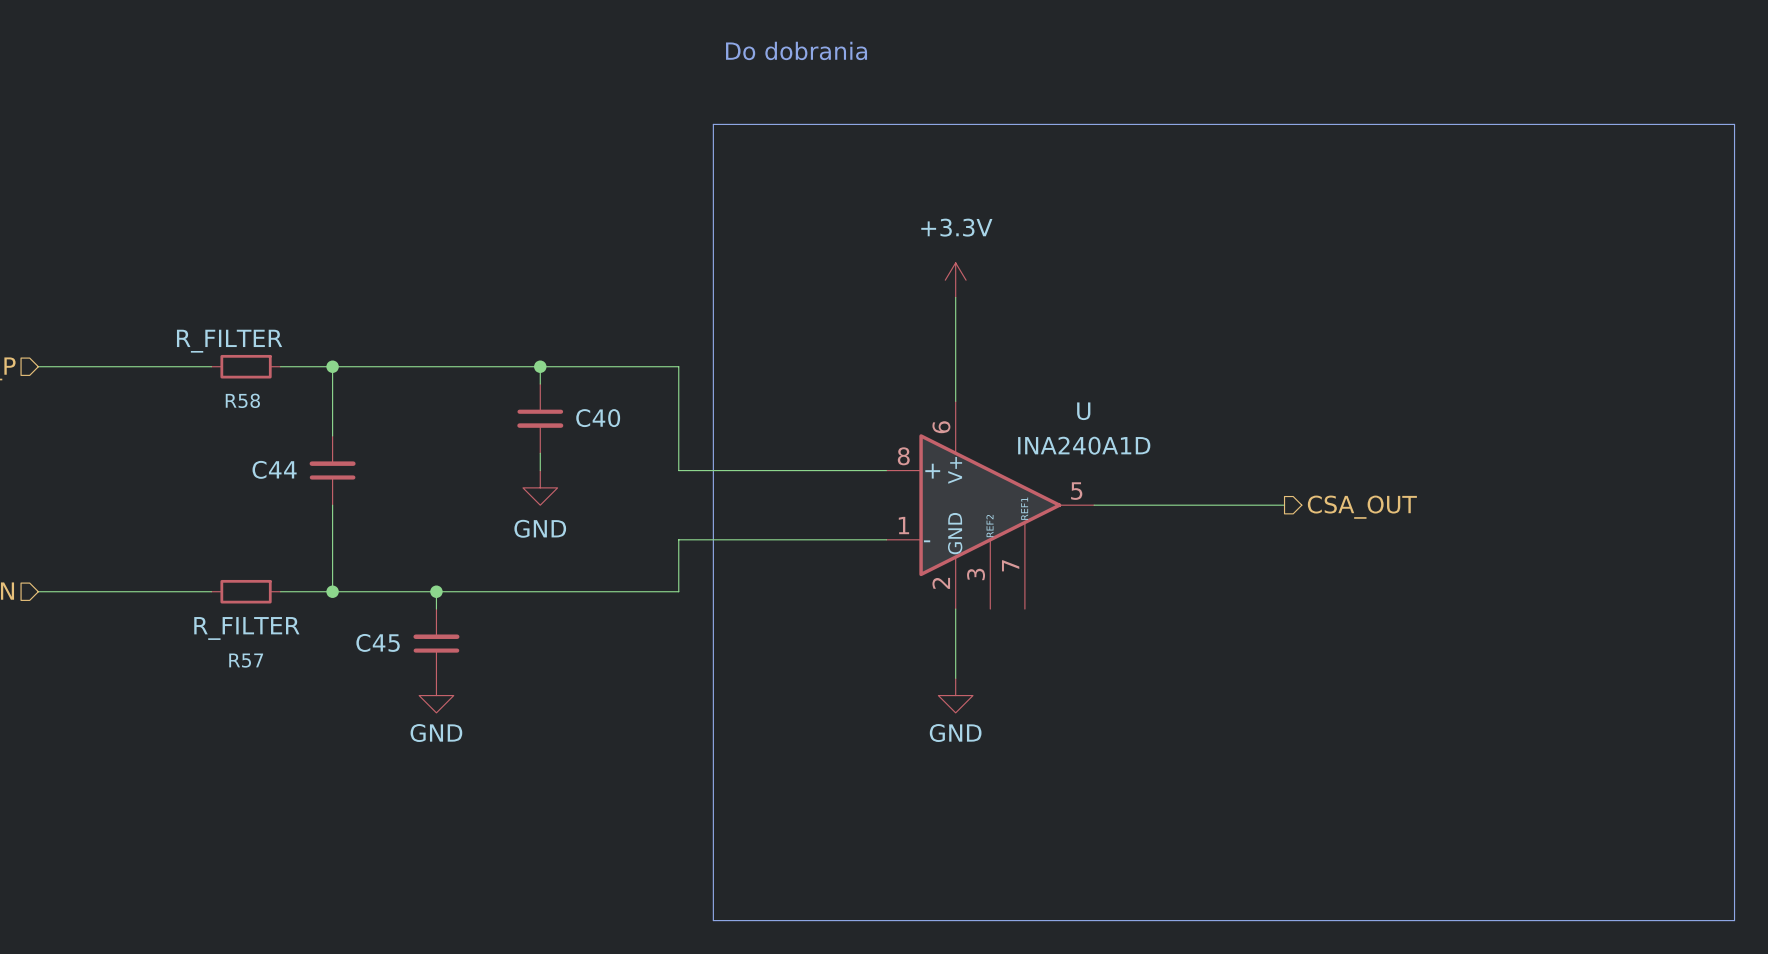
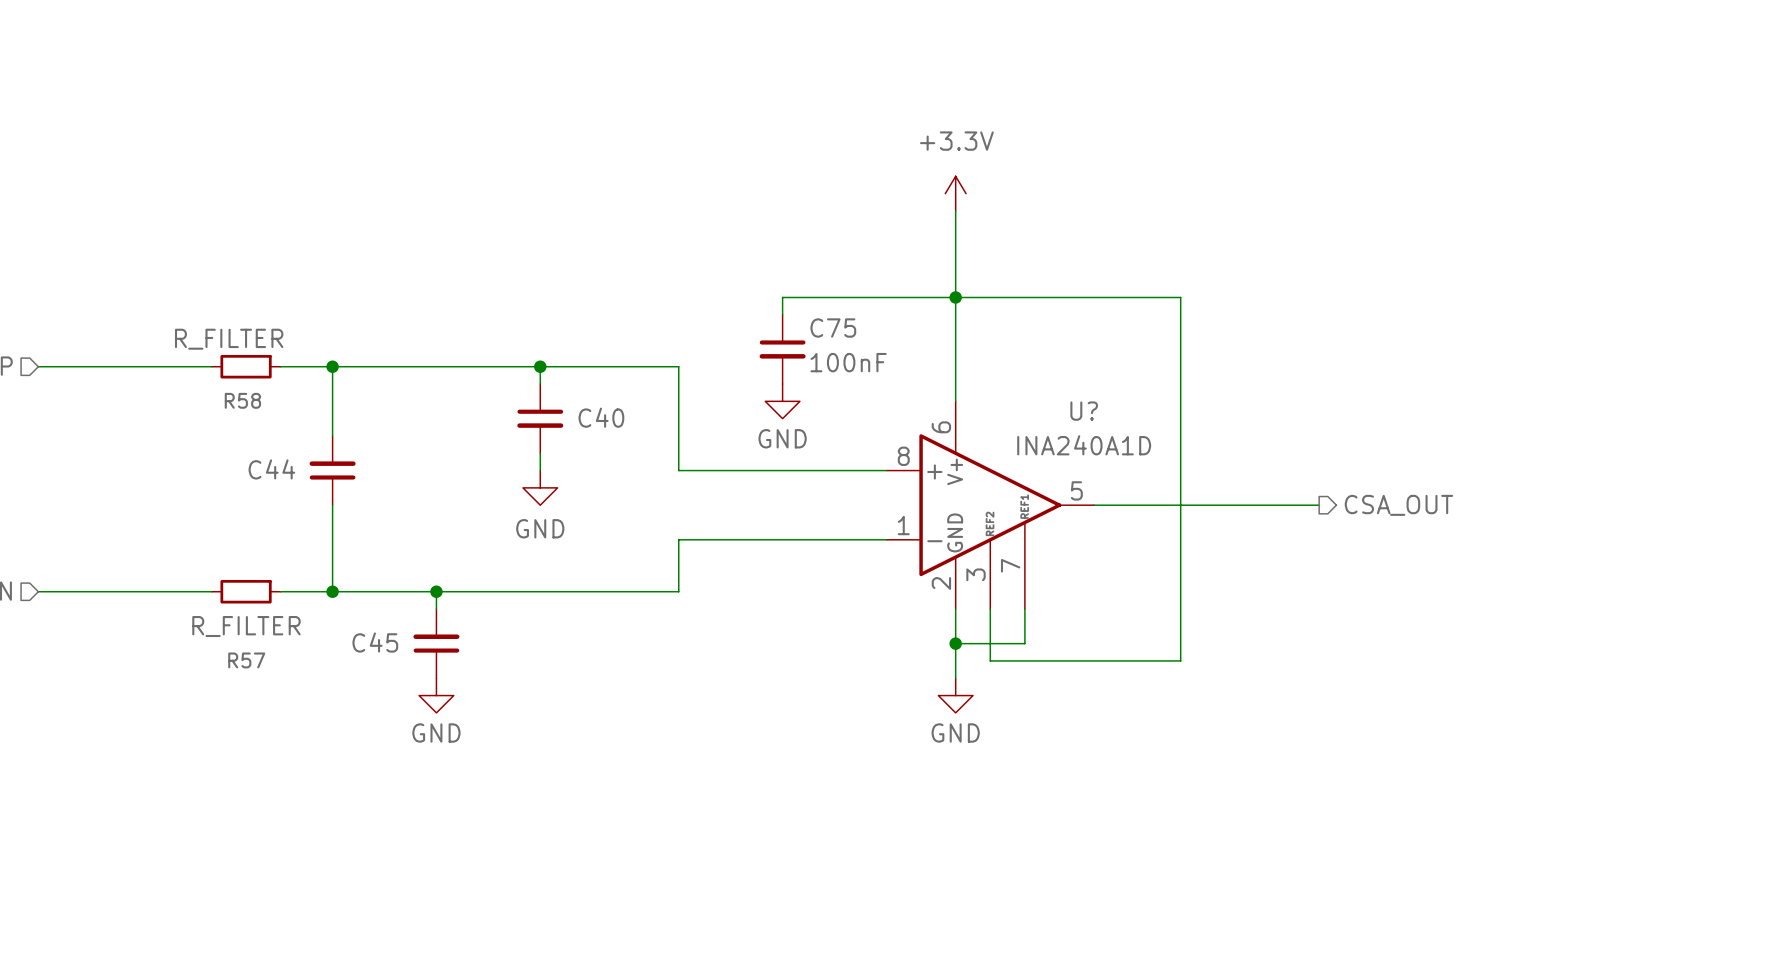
text: Do dobrania (796, 50) -> none
line: (713, 124) (1734, 124) (1734, 920) (713, 920) (713, 124) -> none
wire: none -> (955, 210) (955, 297)
power symbol position: +3.3V (955, 280) -> +3.3V (955, 193)
junction: none -> (955, 297)
wire: none -> (782, 314) (782, 297) (1180, 297) (1180, 660) (990, 660) (990, 609)
C75: none -> 100nF (782, 349)
power symbol: none -> GND (782, 401)
U name: U (1083, 411) -> U? (1084, 411)
wire: none -> (1284, 505) (1319, 505)
hierarchical label position: CSA_OUT (1362, 507) -> CSA_OUT (1398, 505)
wire: none -> (1024, 609) (1024, 643) (955, 643)
junction: none -> (955, 643)

